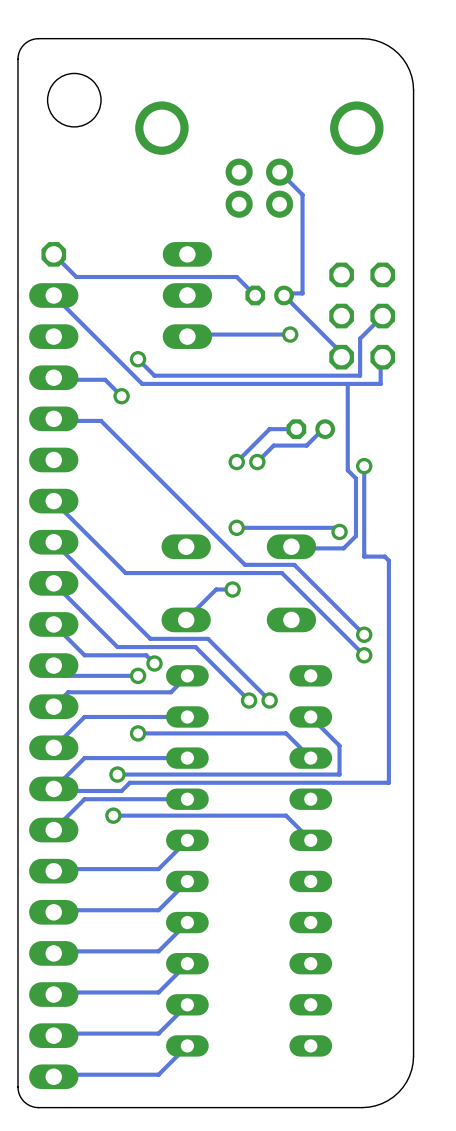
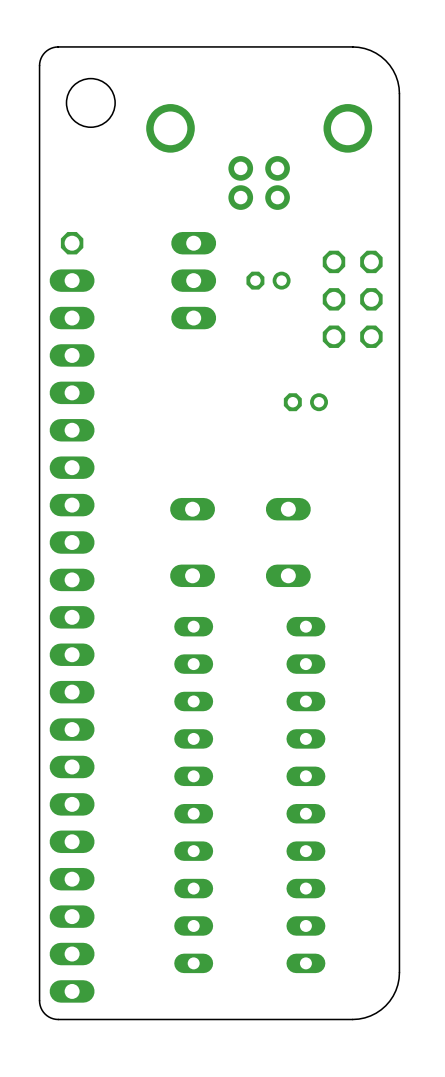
track: (279, 172) (302, 194) (302, 293) (286, 293) (284, 295) (343, 355) (341, 357) -> none
track: (53, 254) (76, 276) (236, 276) (255, 295) -> none
track: (53, 295) (142, 383) (380, 383) (380, 359) (382, 357) -> none
track: (382, 316) (360, 338) (360, 375) (154, 375) (138, 359) -> none
track: (290, 334) (187, 334) (187, 336) -> none
via: (290, 334) -> none
via: (138, 359) -> none
track: (53, 377) (55, 379) (105, 379) (121, 396) -> none
track: (347, 383) (347, 470) (355, 478) (355, 536) (343, 548) (294, 548) (291, 546) -> none
via: (121, 396) -> none
track: (53, 418) (55, 420) (101, 420) (244, 564) (294, 564) (364, 634) -> none
track: (296, 429) (269, 429) (236, 462) -> none
track: (325, 429) (306, 445) (273, 445) (257, 462) -> none
via: (236, 462) -> none
via: (257, 462) -> none
track: (364, 466) (364, 556) (384, 556) (388, 560) (388, 782) (129, 782) (121, 790) (55, 790) (53, 788) (84, 758) (187, 758) -> none
via: (364, 466) -> none
track: (53, 501) (125, 573) (281, 573) (364, 655) -> none
track: (236, 527) (335, 527) (339, 531) -> none
via: (236, 527) -> none
via: (339, 531) -> none
track: (53, 542) (150, 638) (207, 638) (269, 700) -> none
track: (53, 583) (117, 647) (195, 647) (249, 700) -> none
track: (232, 589) (216, 589) (186, 619) -> none
via: (232, 589) -> none
track: (53, 624) (84, 655) (146, 655) (154, 663) -> none
via: (364, 634) -> none
via: (364, 655) -> none
via: (154, 663) -> none
track: (53, 665) (64, 675) (138, 675) -> none
via: (138, 675) -> none
track: (187, 675) (170, 692) (68, 692) (53, 706) -> none
via: (249, 700) -> none
via: (269, 700) -> none
track: (187, 716) (84, 716) (53, 747) -> none
track: (310, 716) (339, 745) (339, 774) (117, 774) -> none
track: (138, 733) (286, 733) (310, 758) -> none
via: (138, 733) -> none
via: (117, 774) -> none
track: (187, 799) (84, 799) (53, 830) -> none
track: (113, 815) (286, 815) (310, 840) -> none
via: (113, 815) -> none
track: (187, 840) (158, 869) (55, 869) (53, 871) -> none
track: (187, 881) (158, 910) (55, 910) (53, 912) -> none
track: (187, 922) (158, 951) (55, 951) (53, 953) -> none
track: (187, 963) (158, 992) (55, 992) (53, 994) -> none
track: (187, 1004) (158, 1033) (55, 1033) (53, 1035) -> none
track: (187, 1045) (158, 1074) (55, 1074) (53, 1076) -> none

